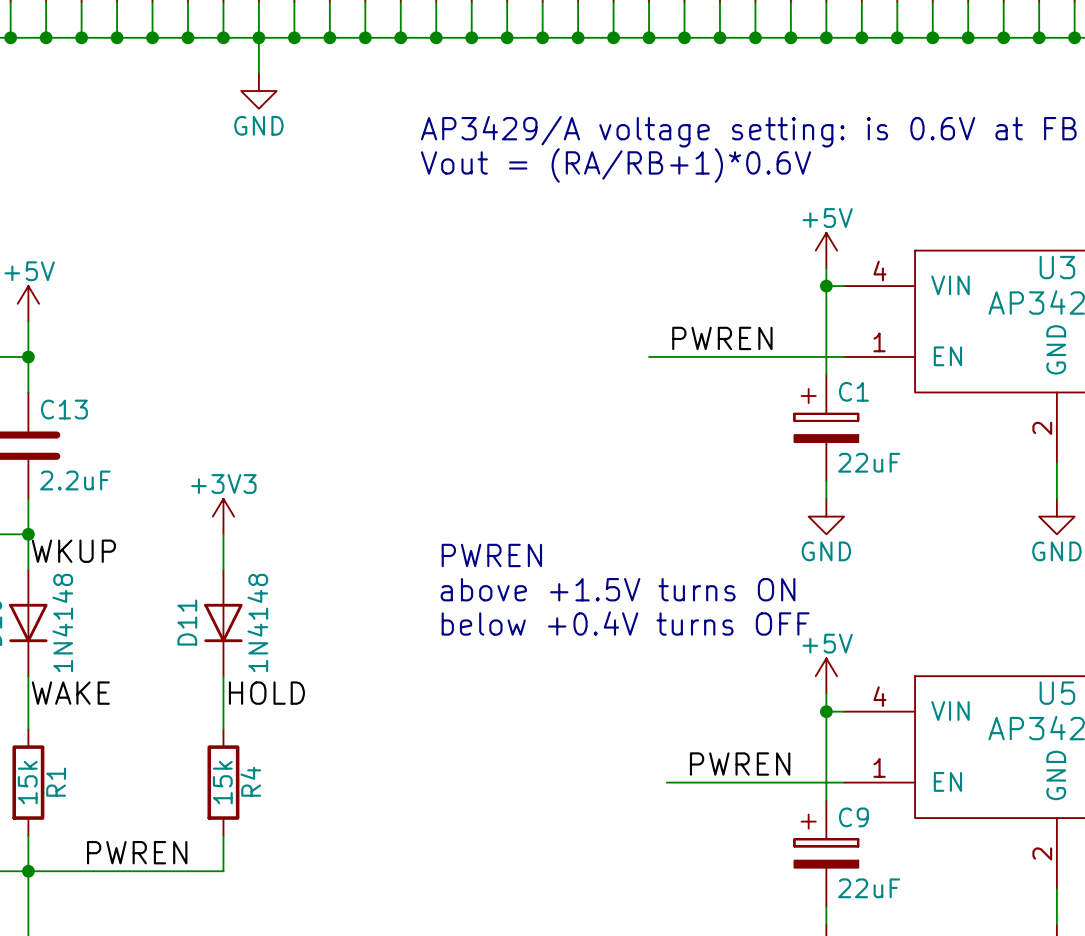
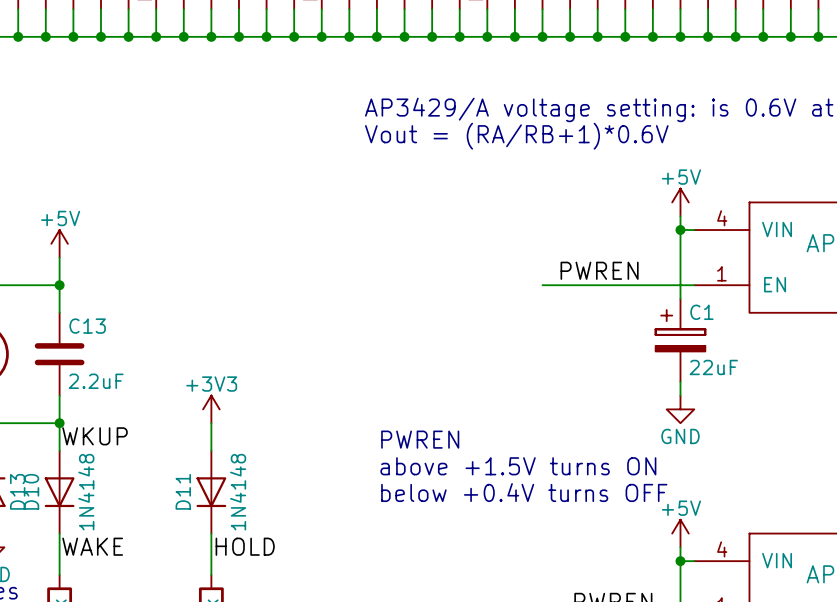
wire: (258, 37) (258, 73) -> none
power symbol: GND (258, 91) -> none

